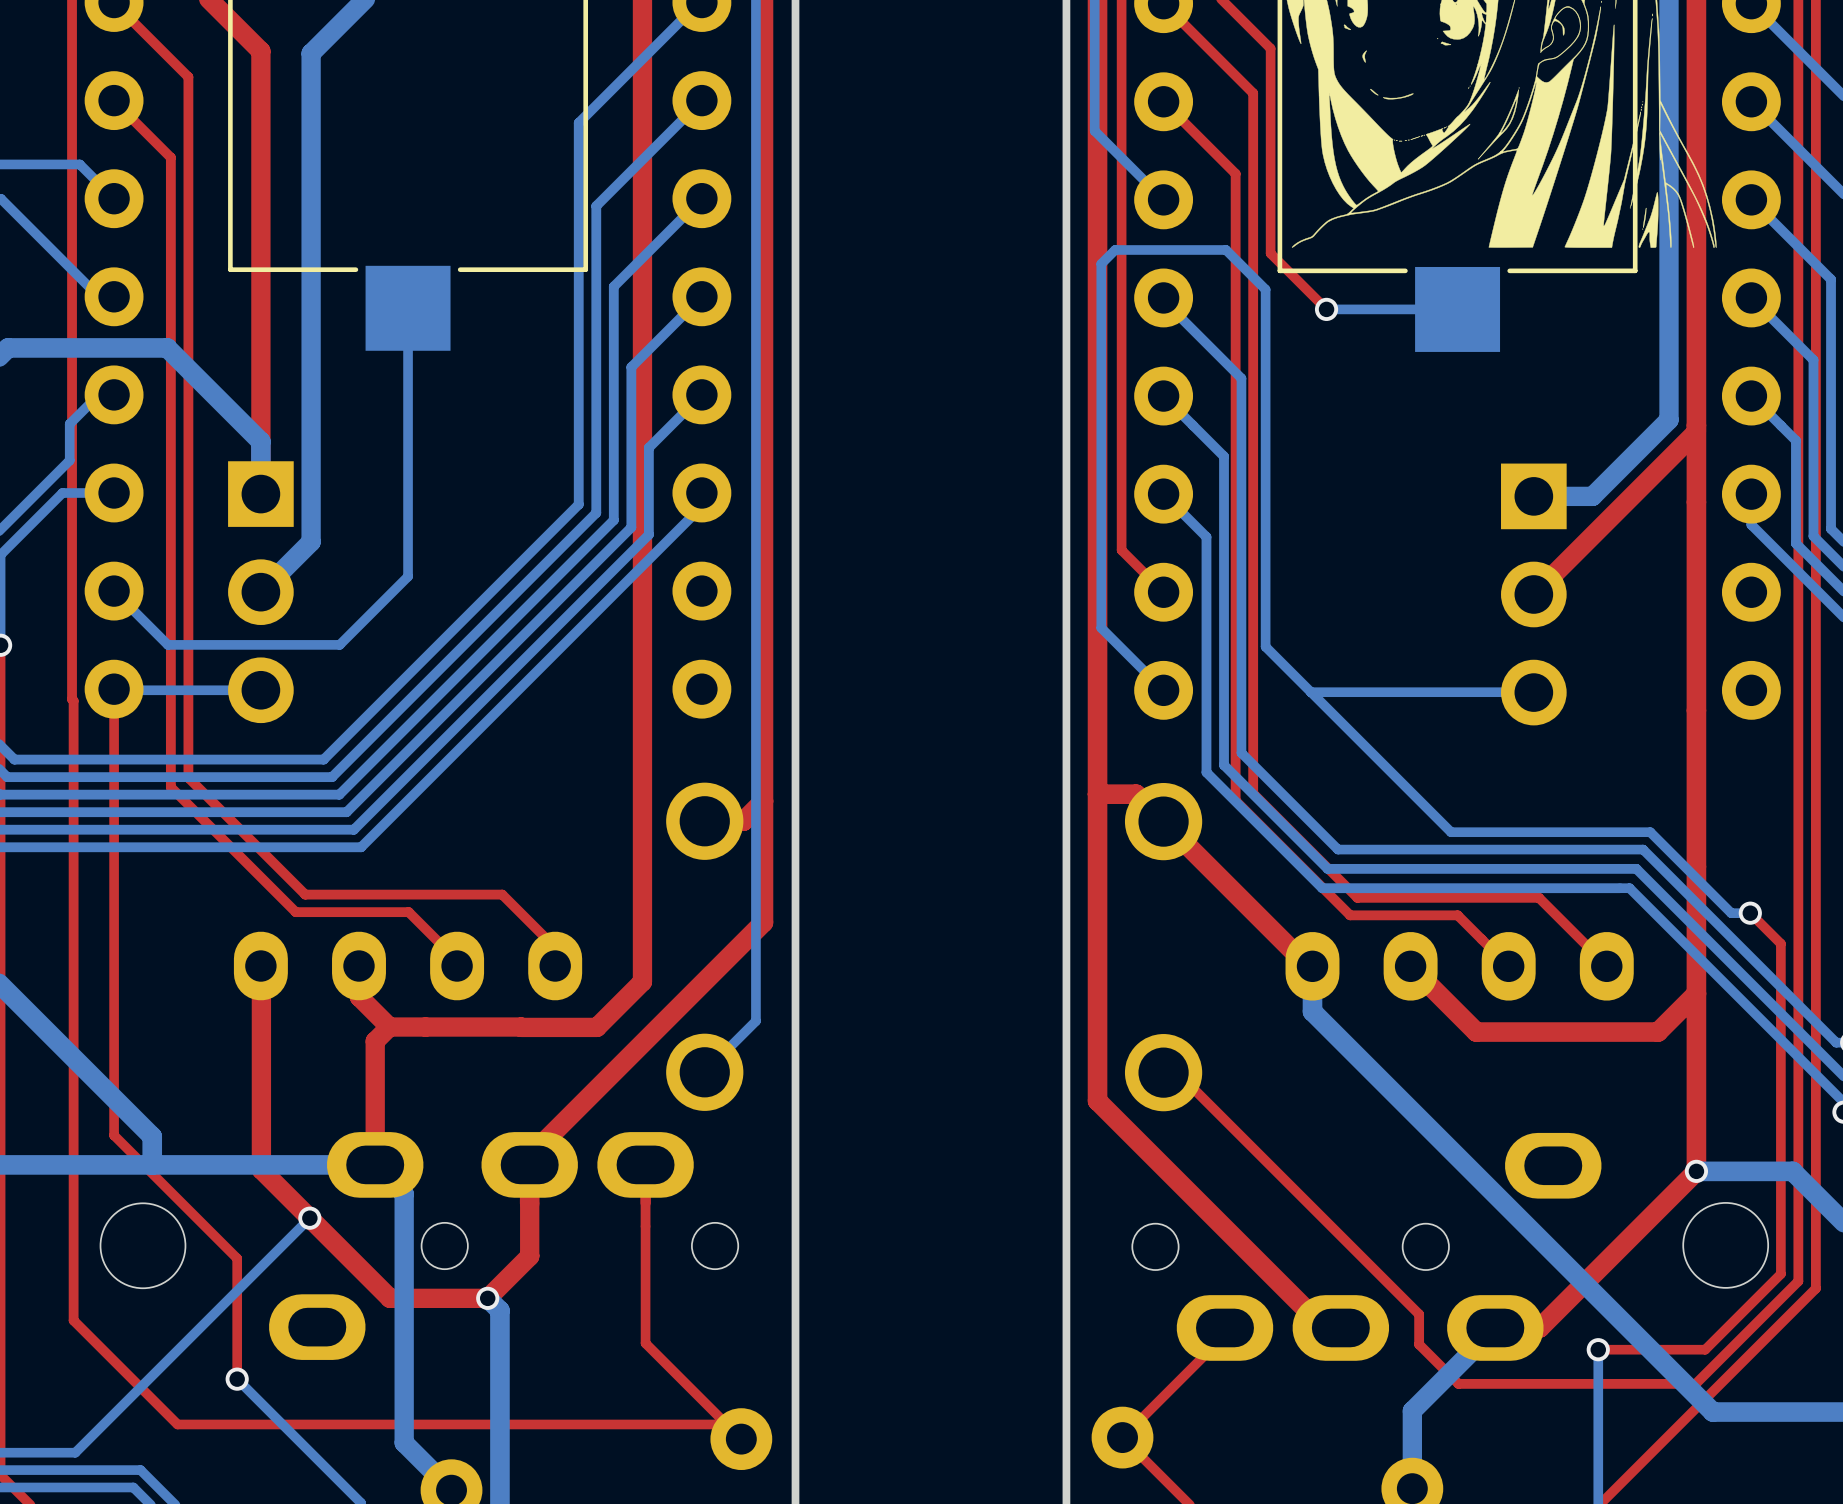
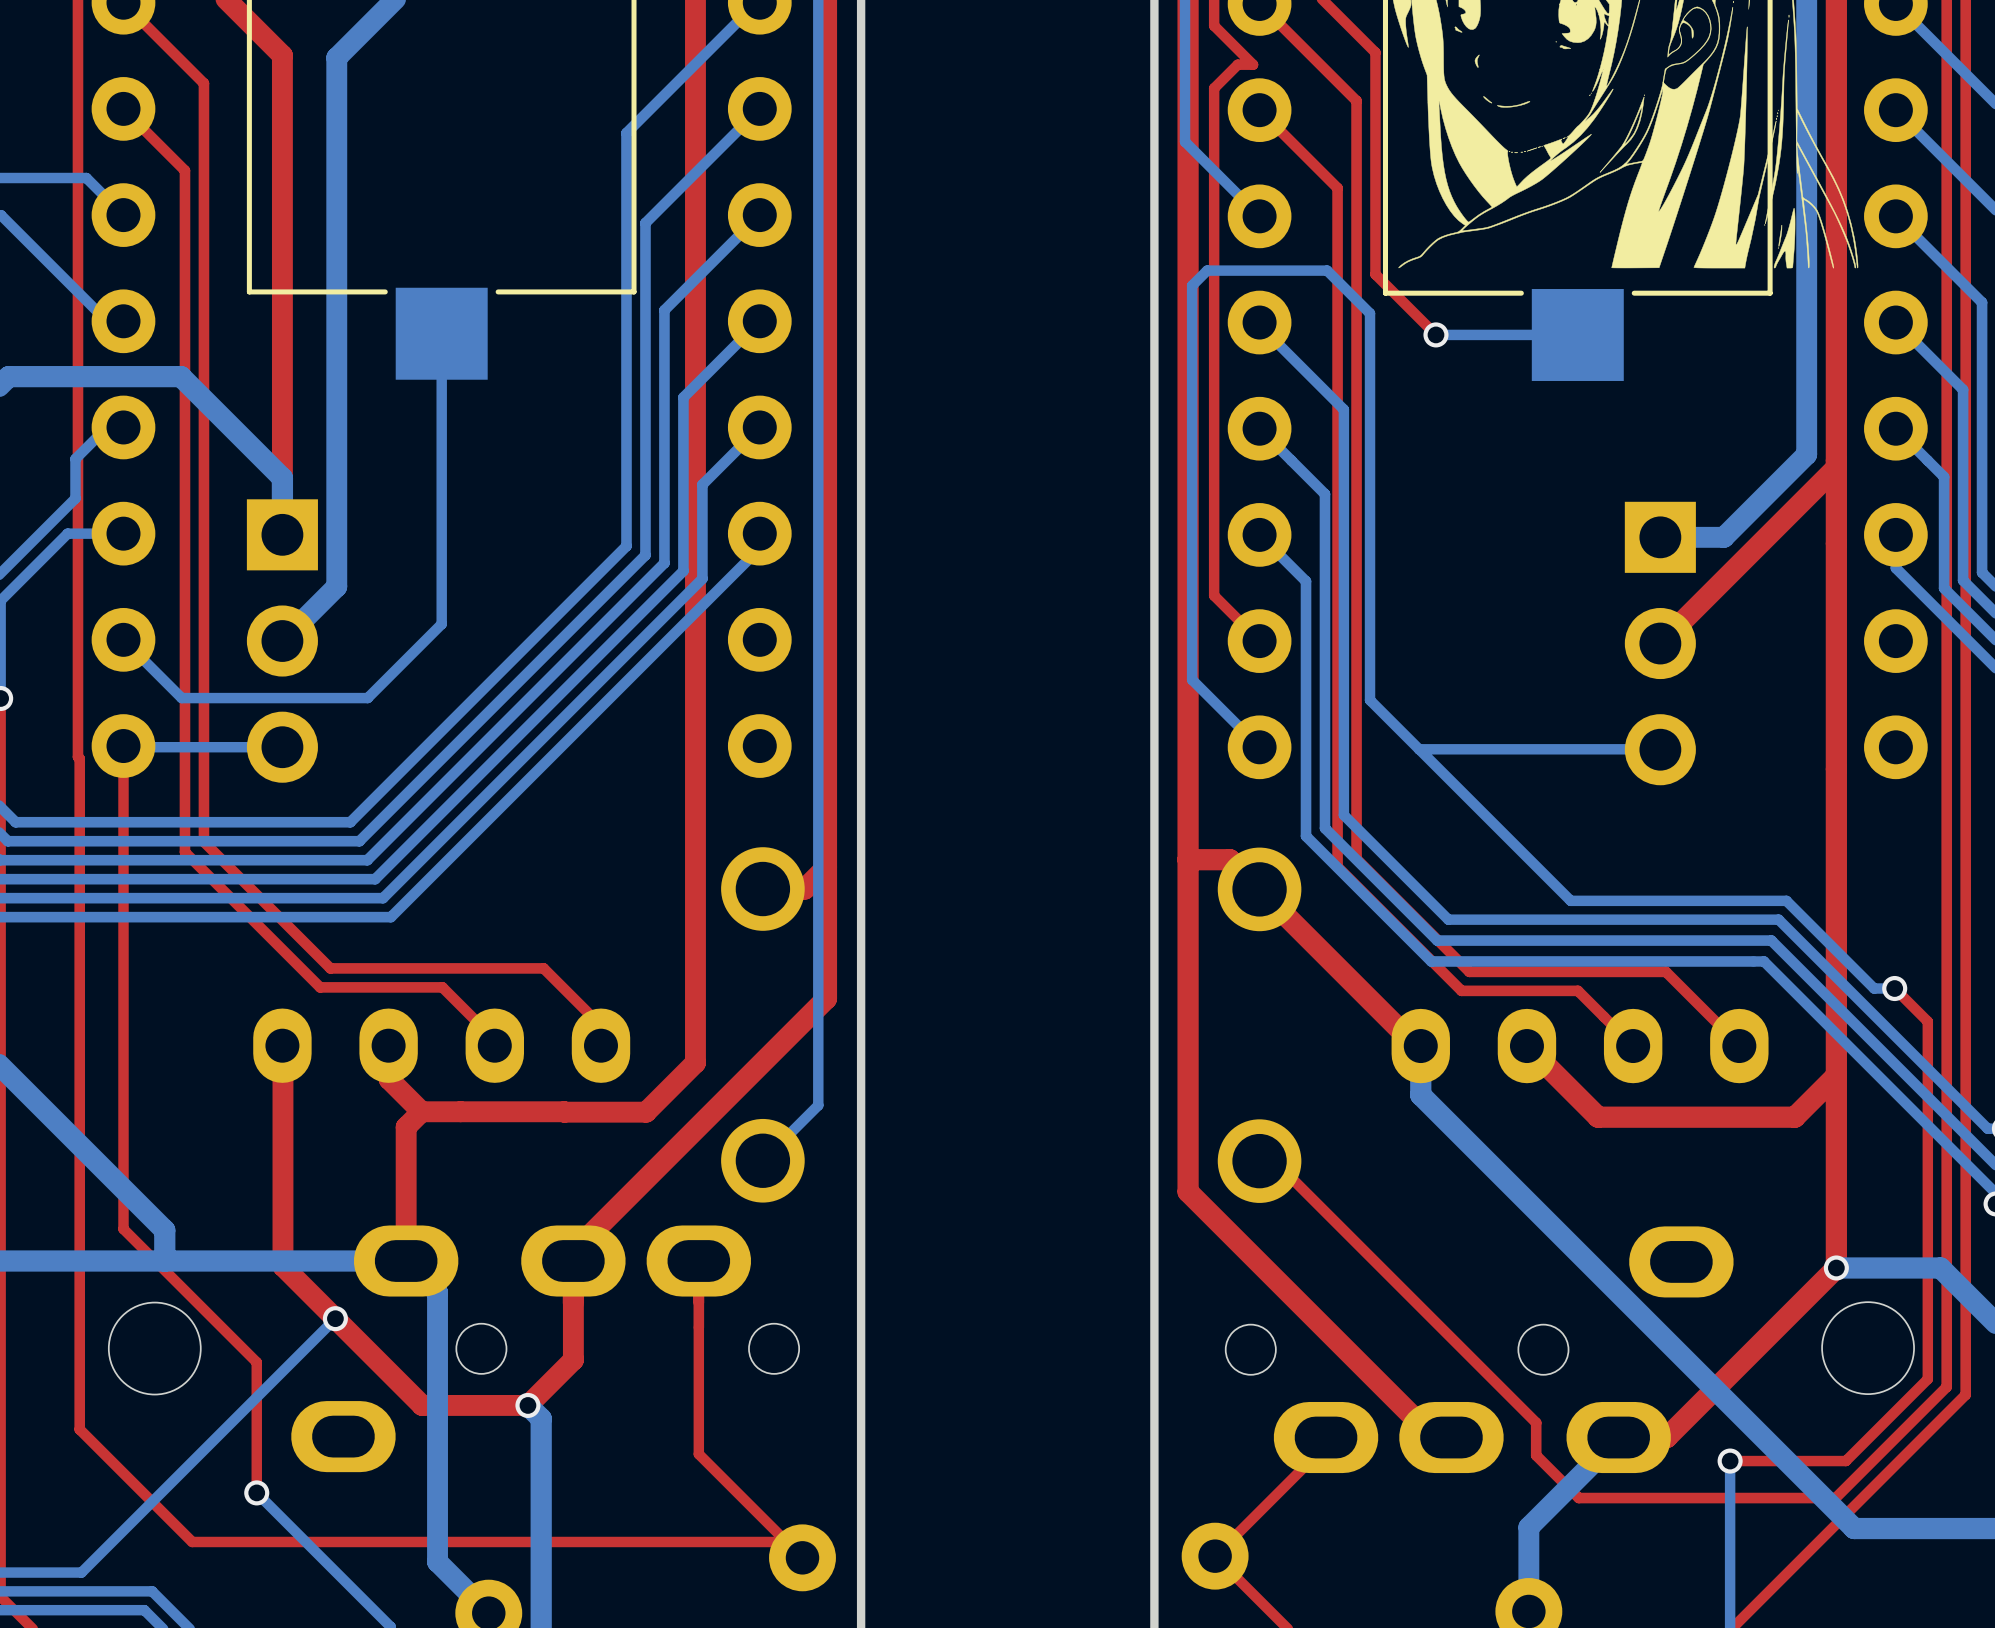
top track: (1121, 23) (1121, 81) -> (1214, 25) (1253, 64) (1237, 64) (1214, 88)

